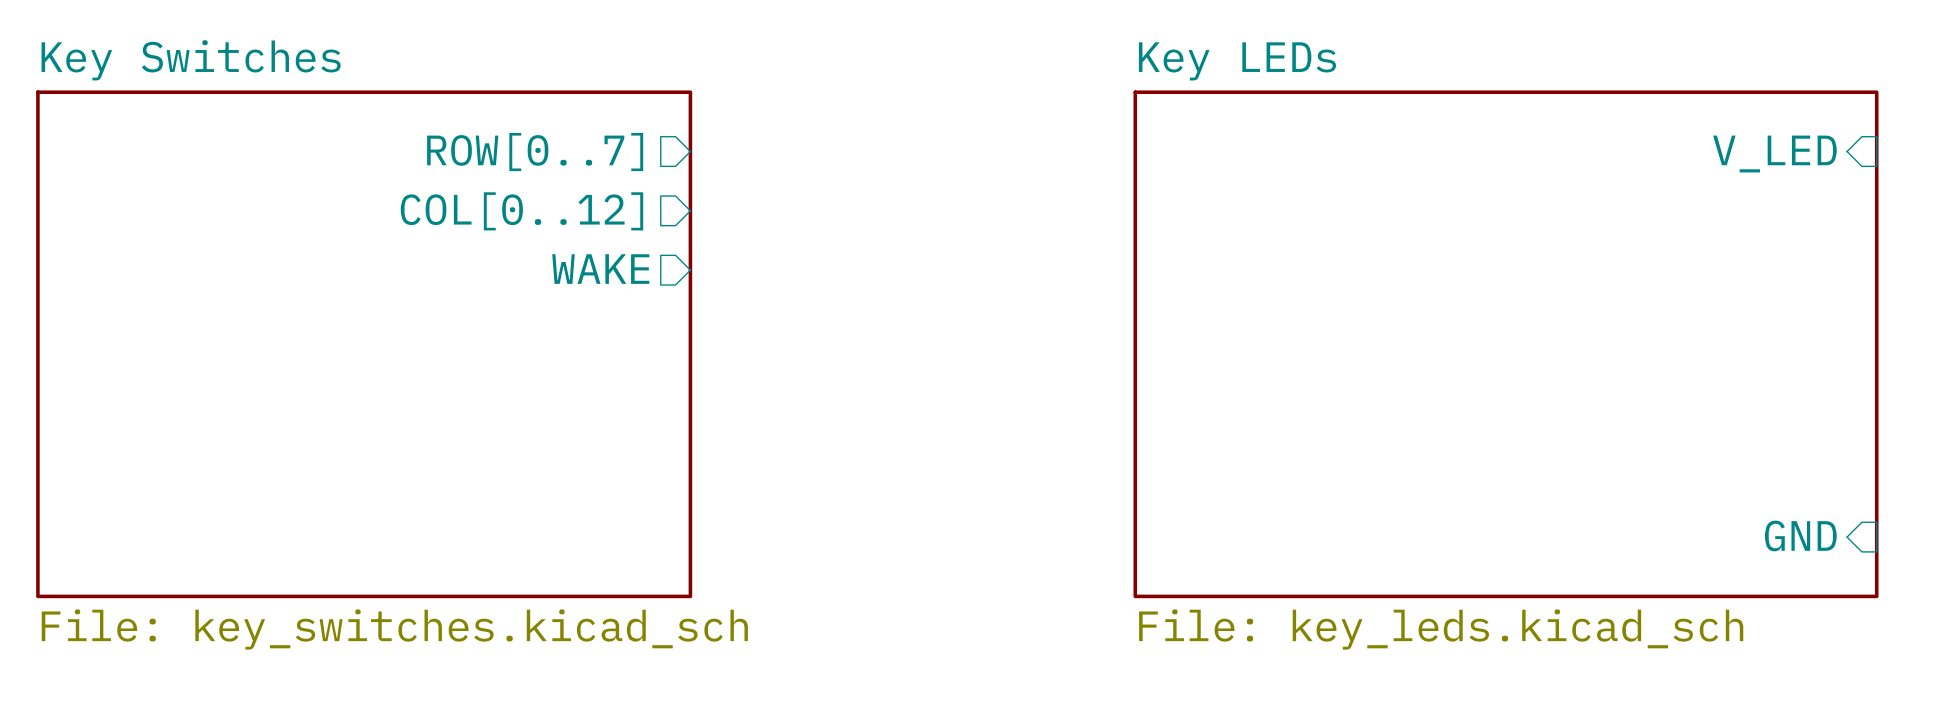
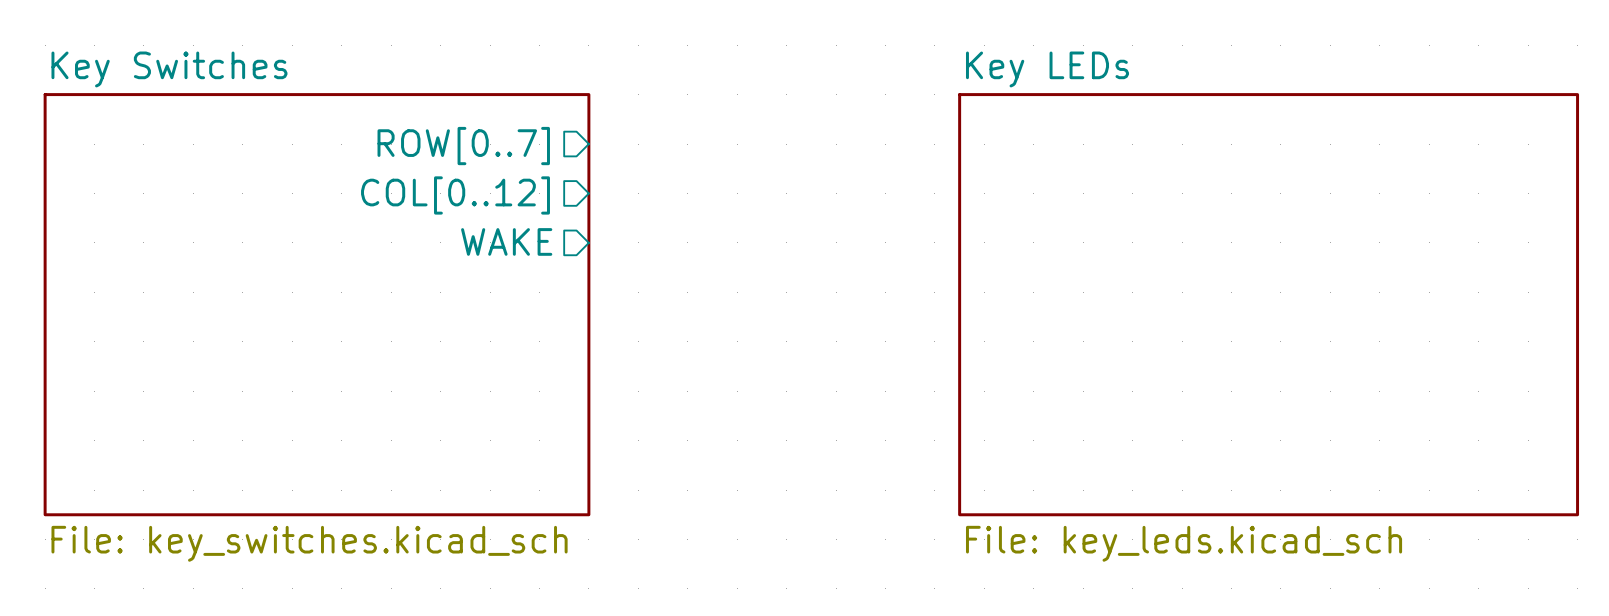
sheet pin: V_LED (1774, 154) -> none
sheet pin: GND (1800, 535) -> none

